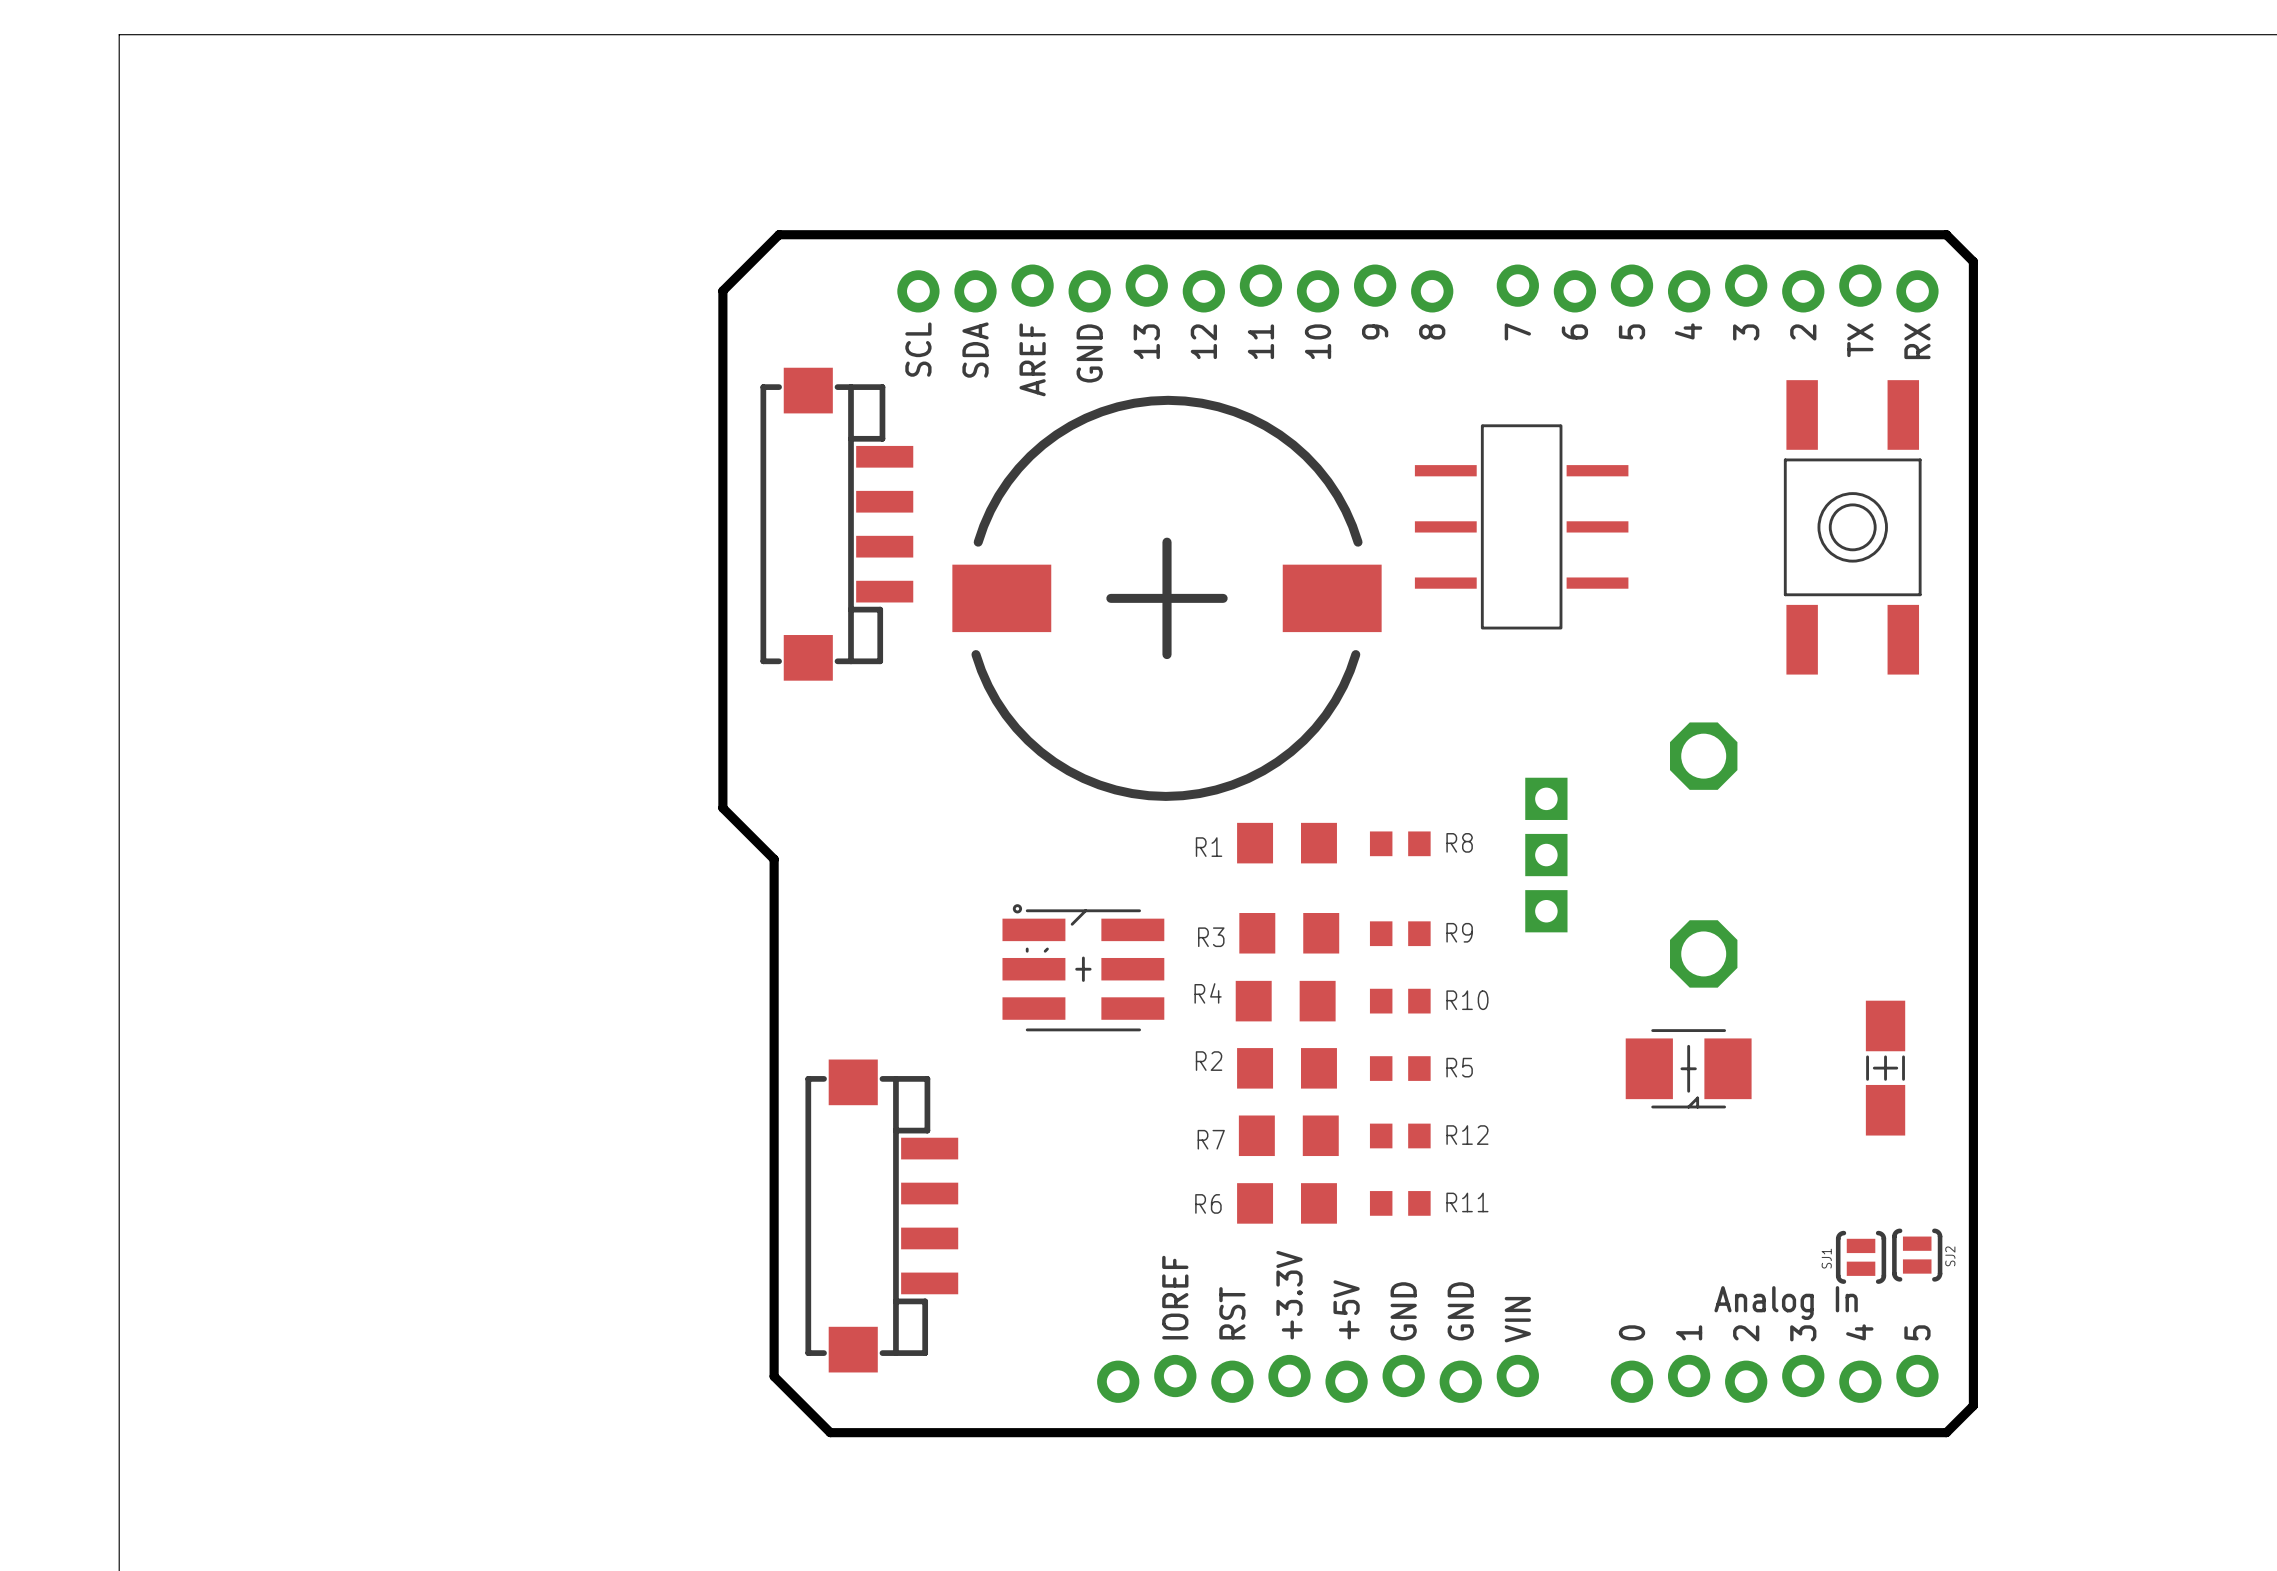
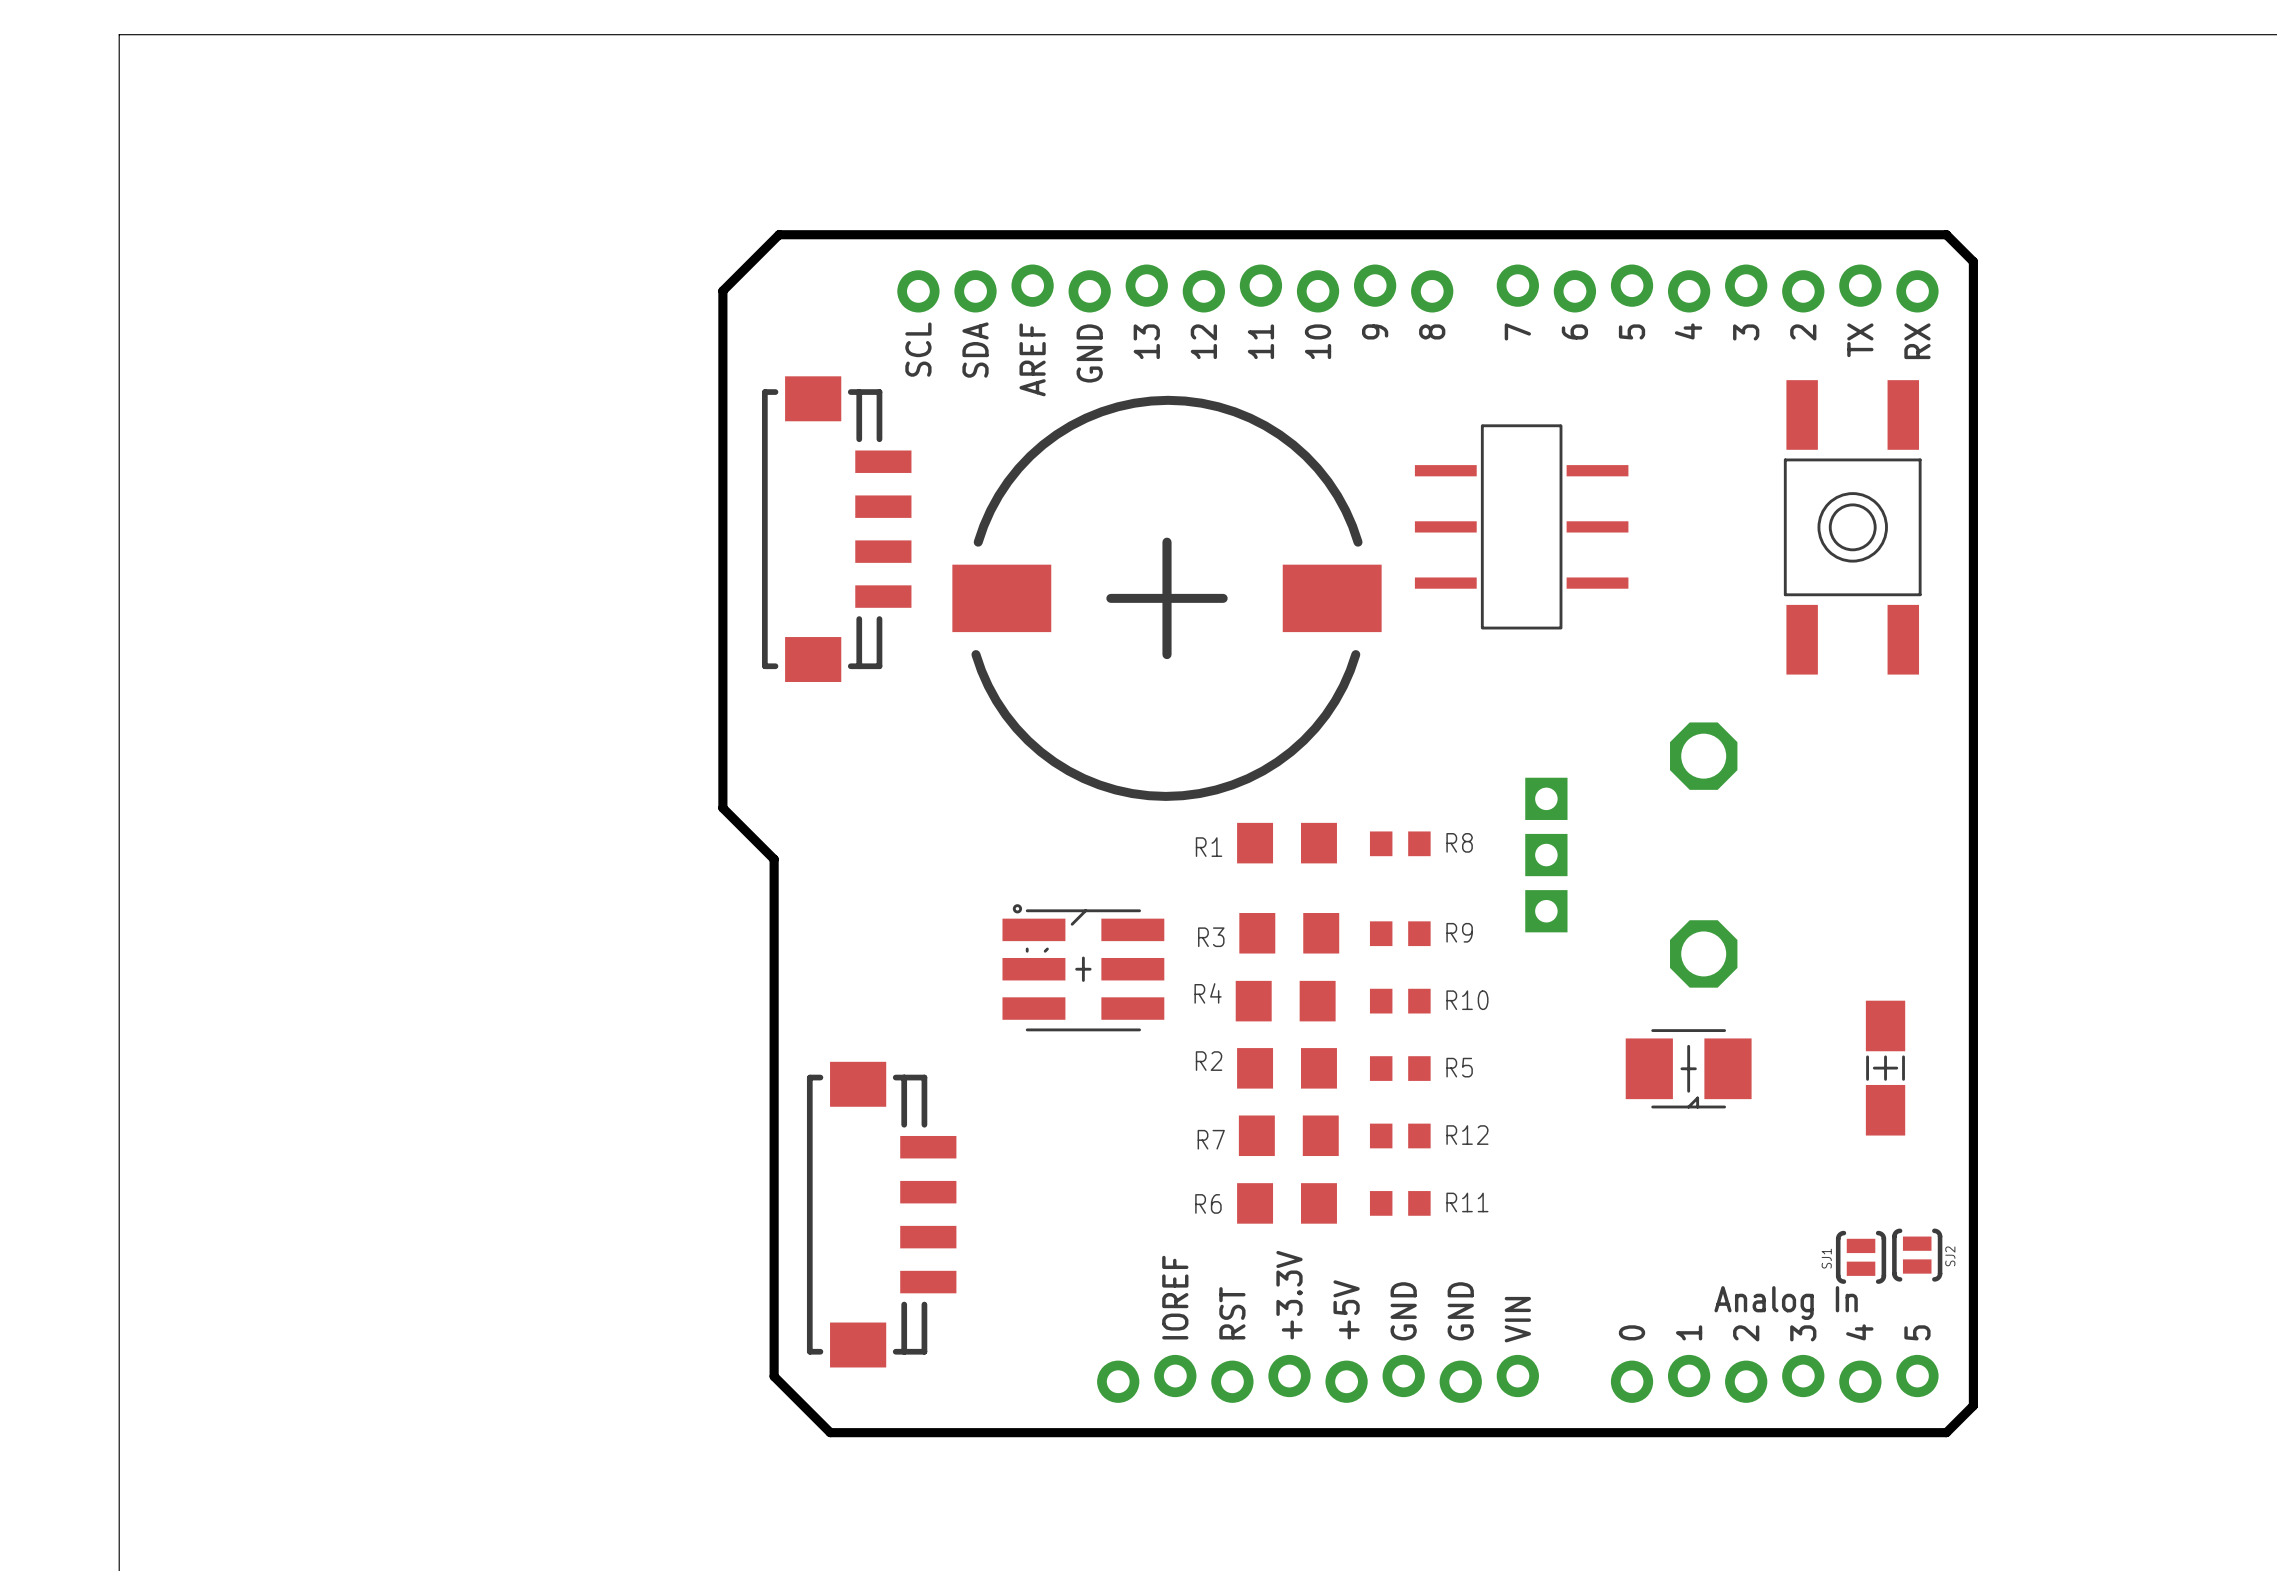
part footprint: [760, 367, 914, 681] -> [761, 376, 912, 682]
part footprint: [805, 1059, 959, 1373] -> [806, 1061, 957, 1368]

